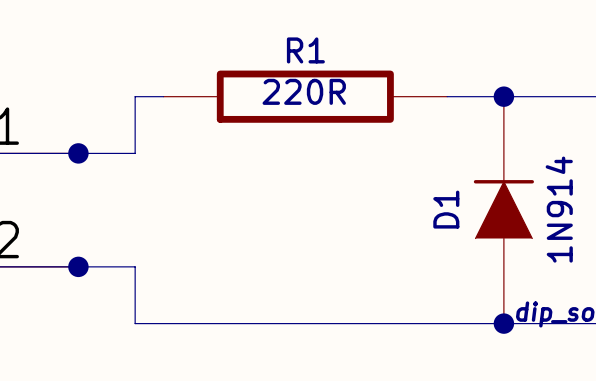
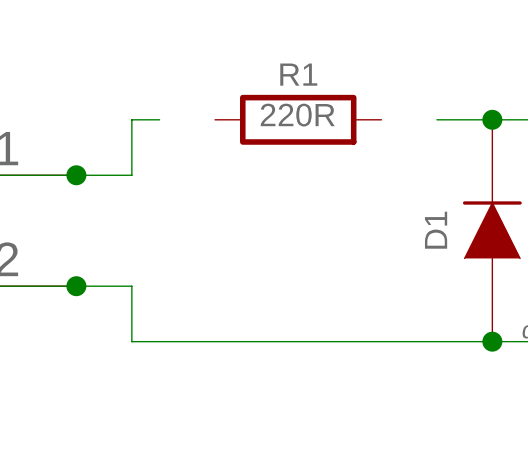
R1 symbol: [163, 70, 448, 123] -> [215, 94, 382, 145]

